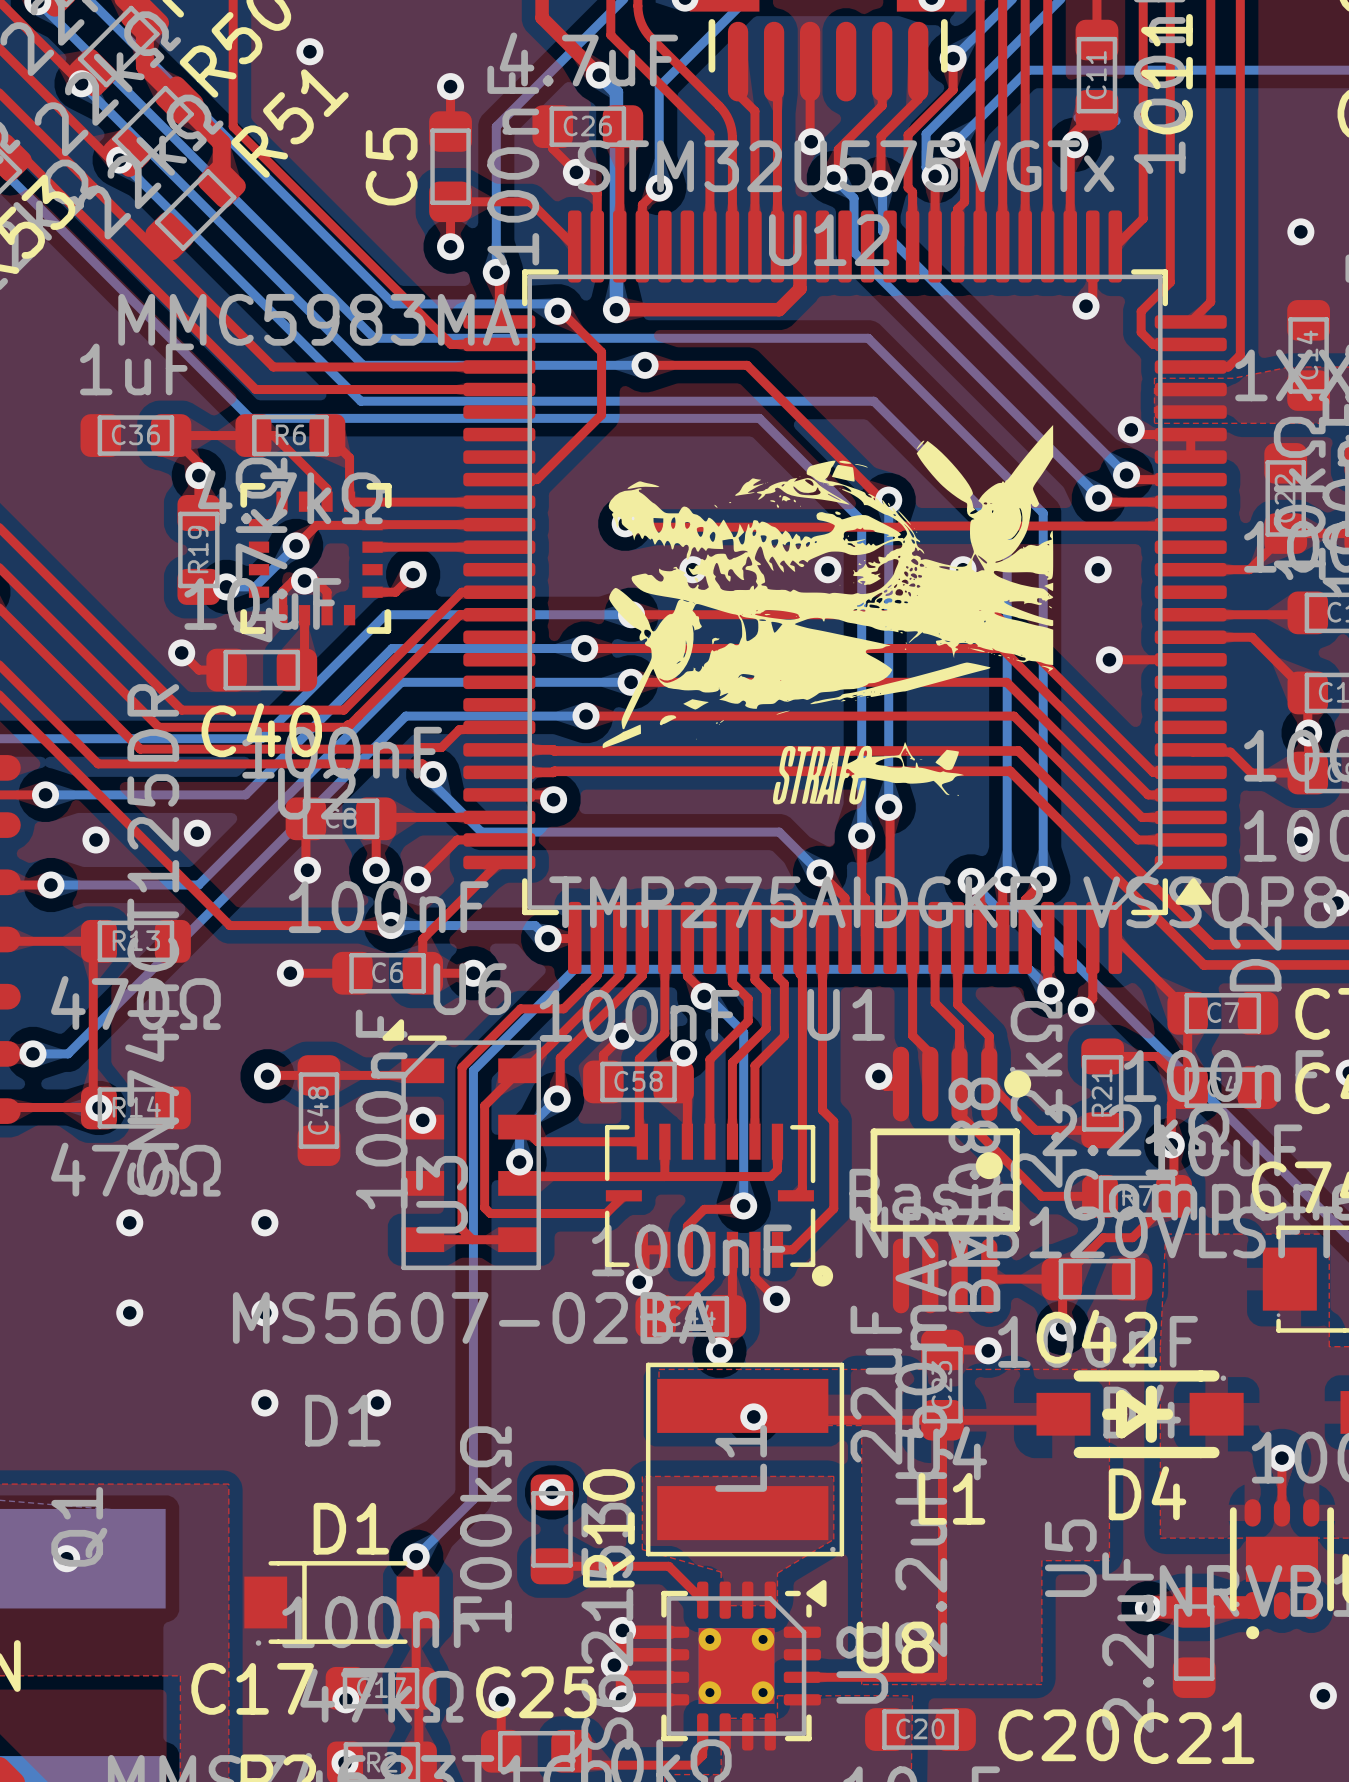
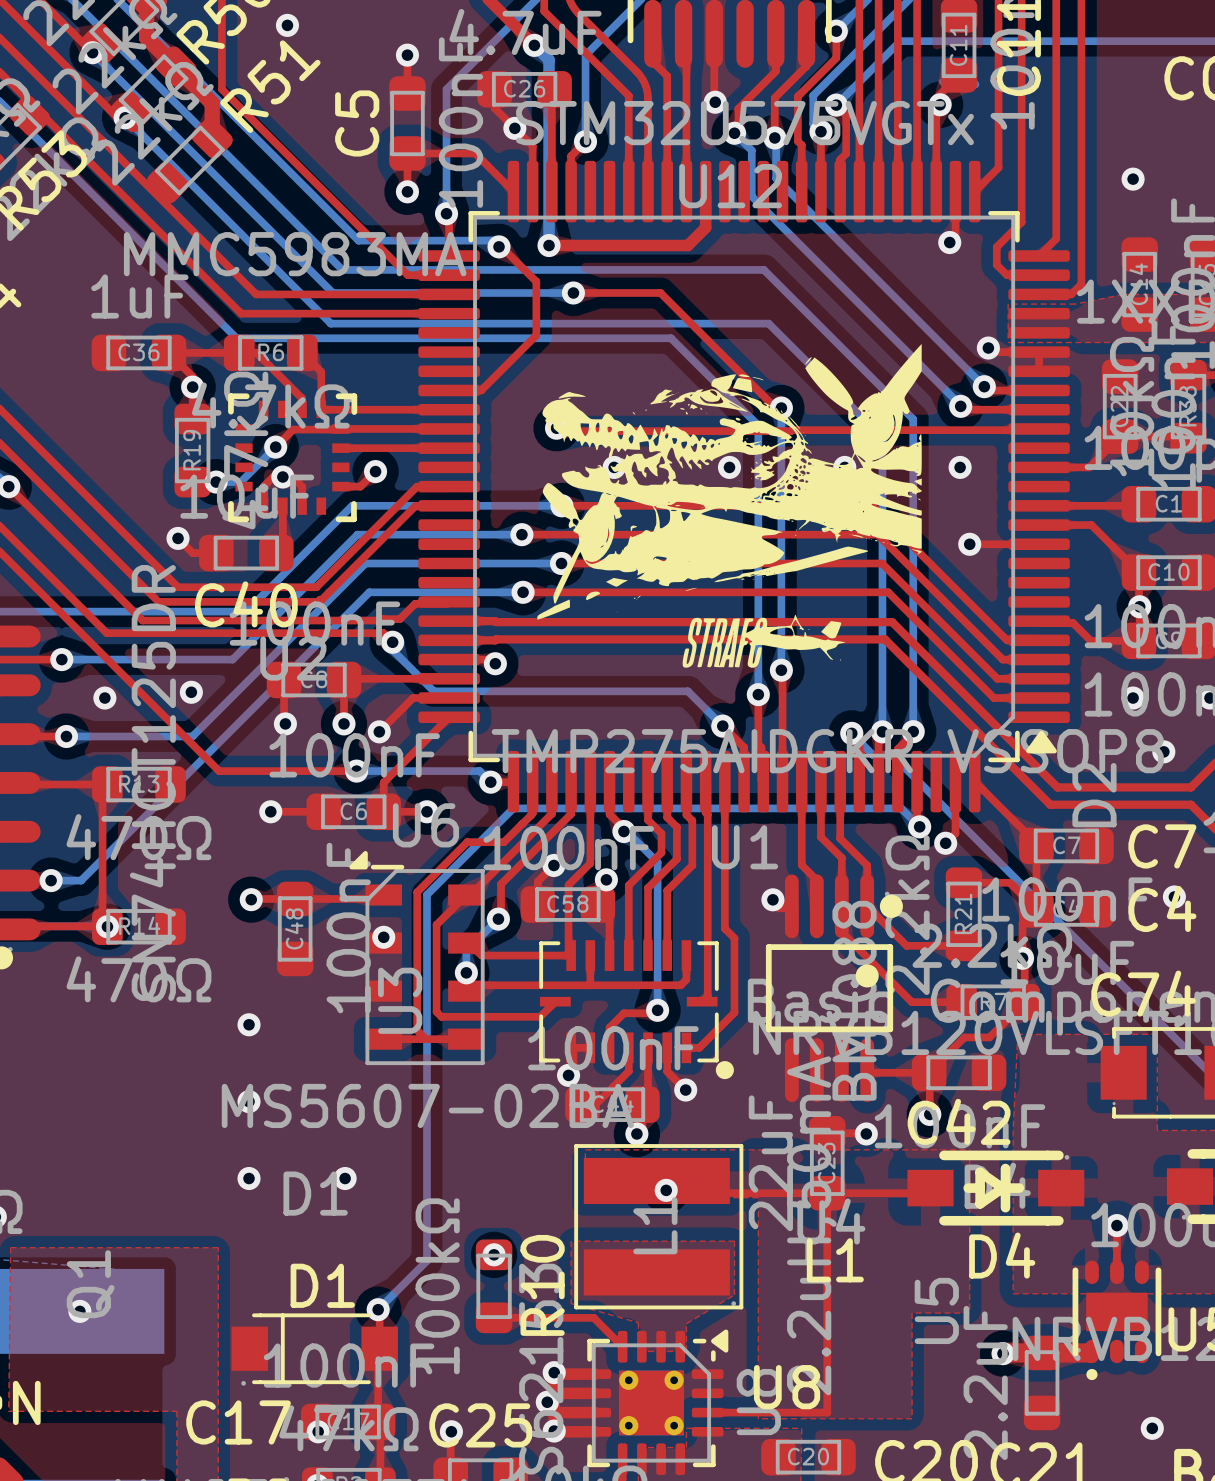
via: (129, 1222) -> none
via: (129, 1312) -> none

